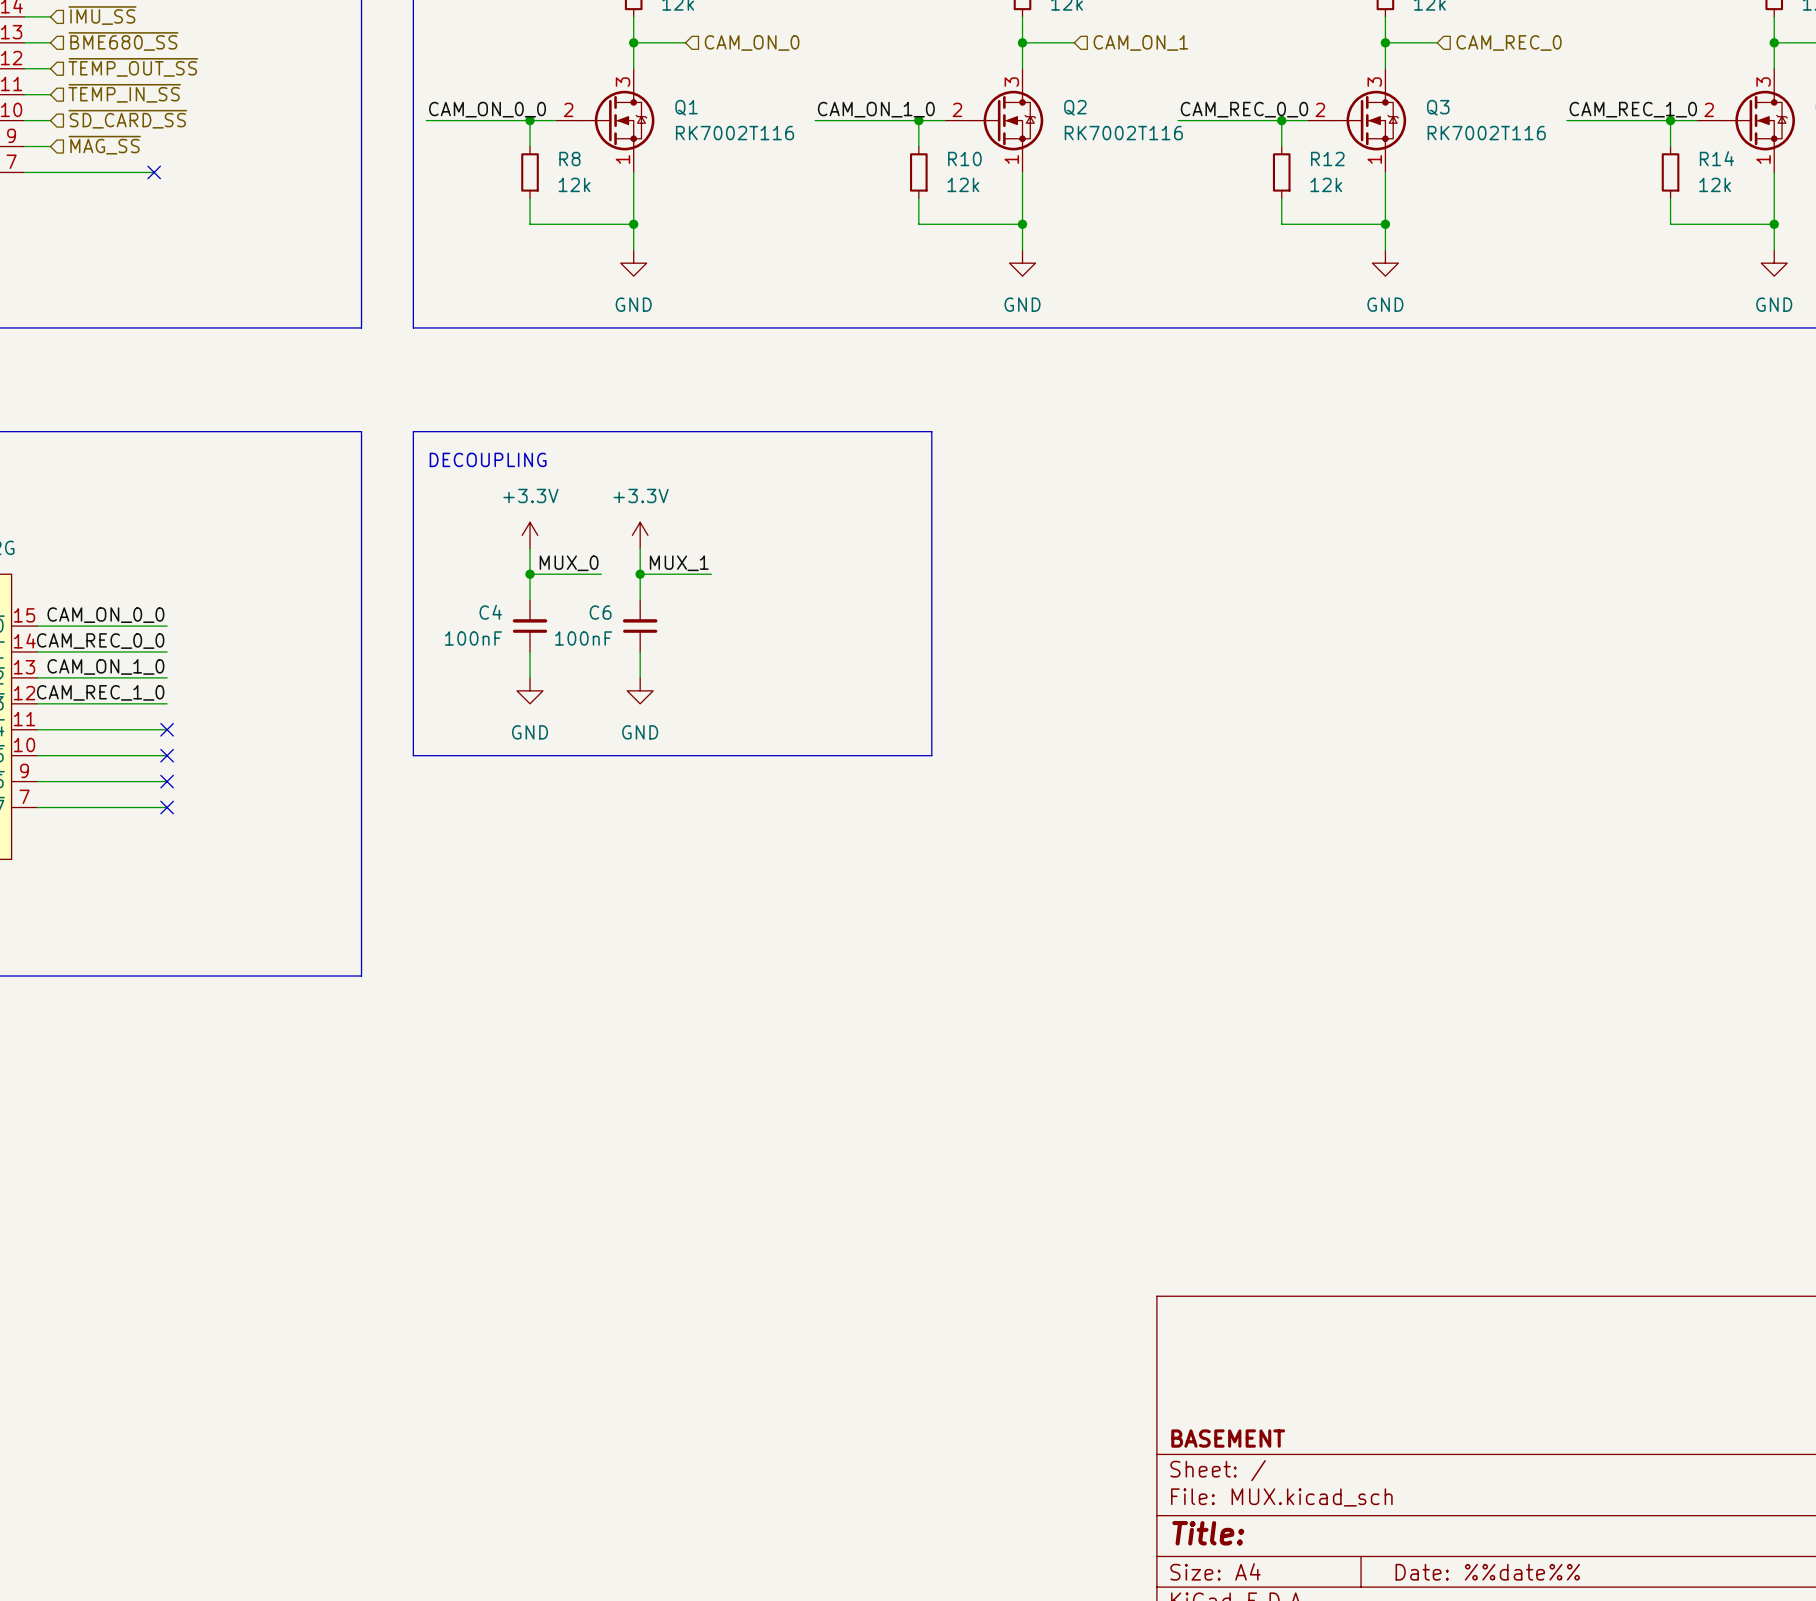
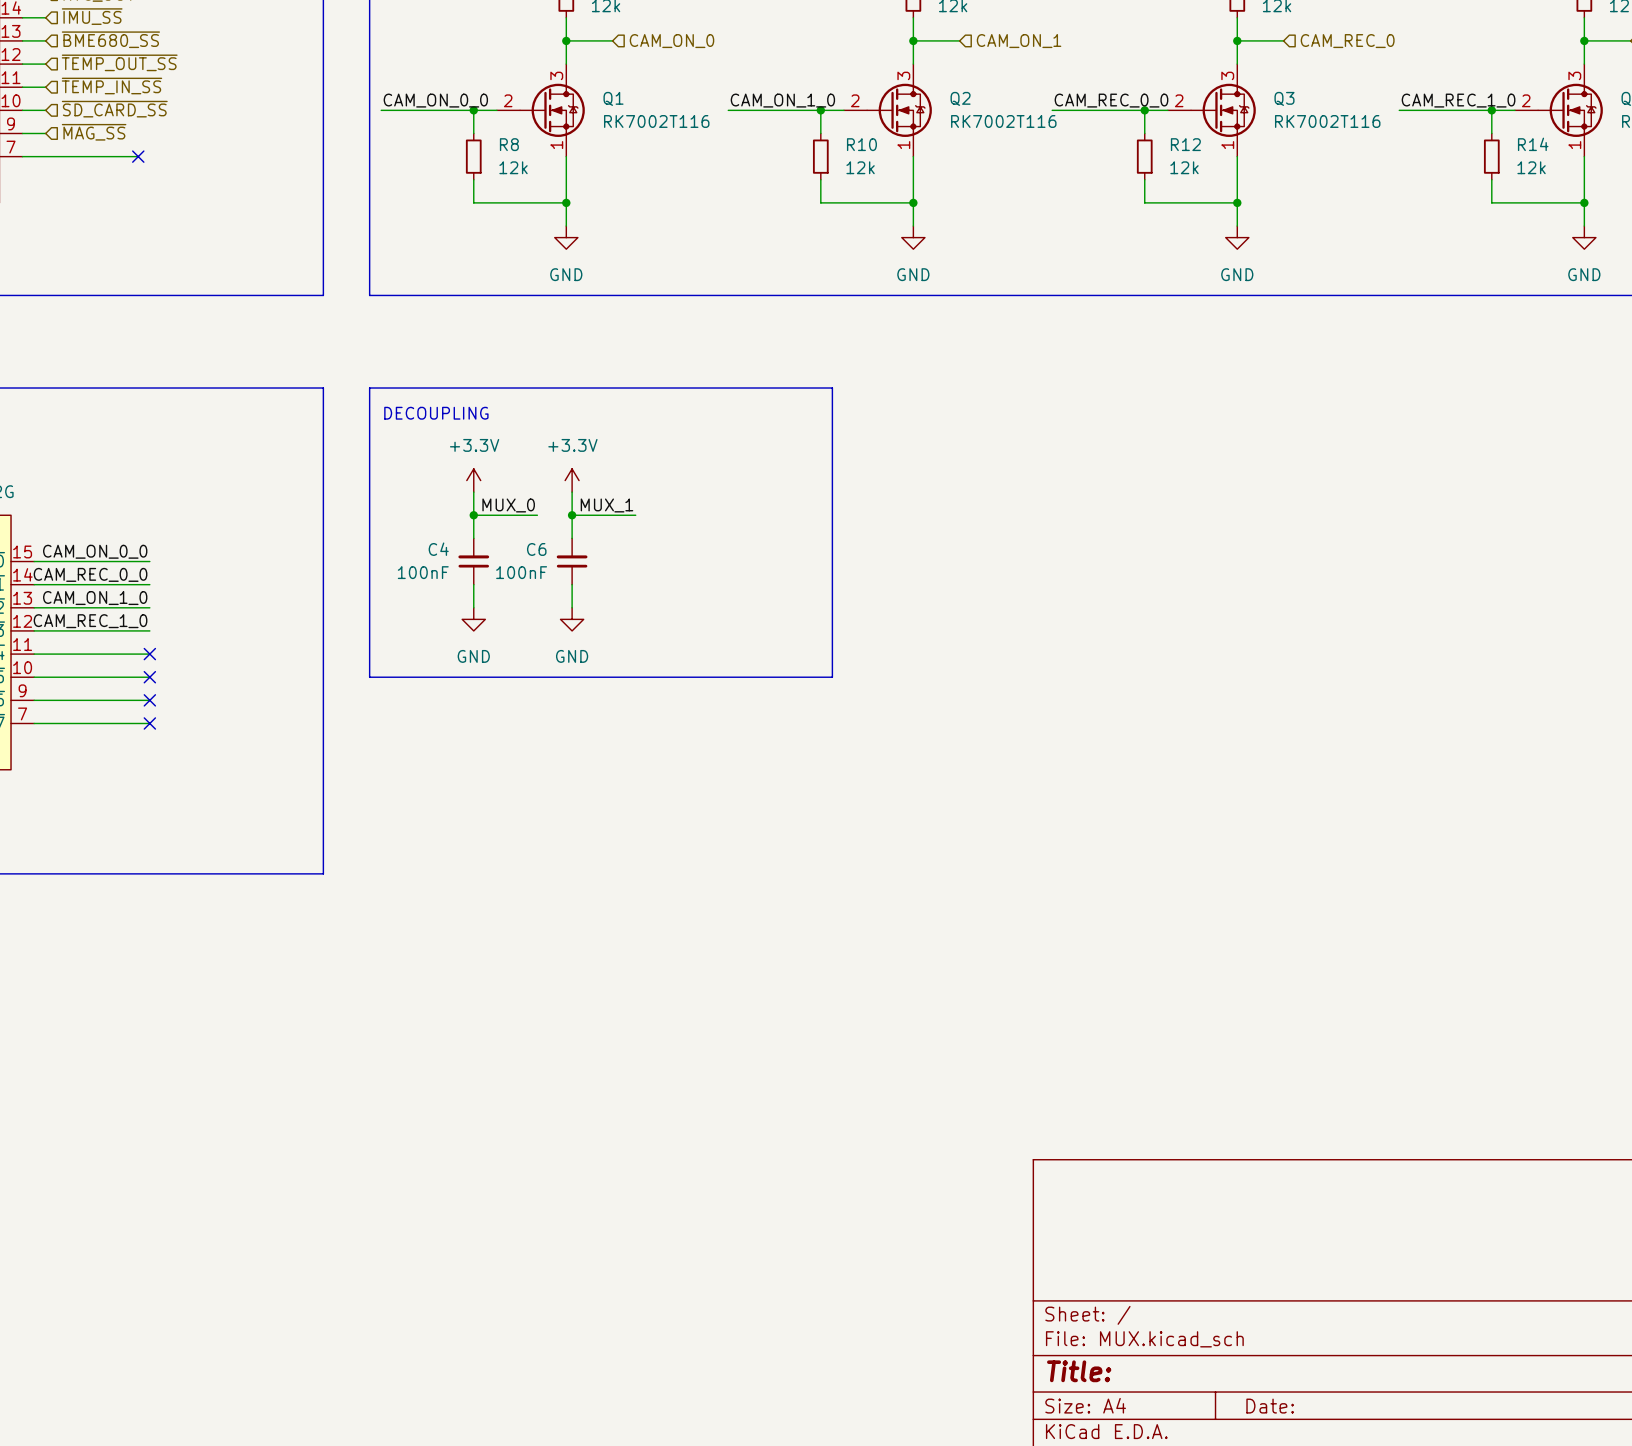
title block: BASEMENT (1228, 1438) -> none
title block: Date: %%date%% (1487, 1572) -> Date: (1270, 1406)

